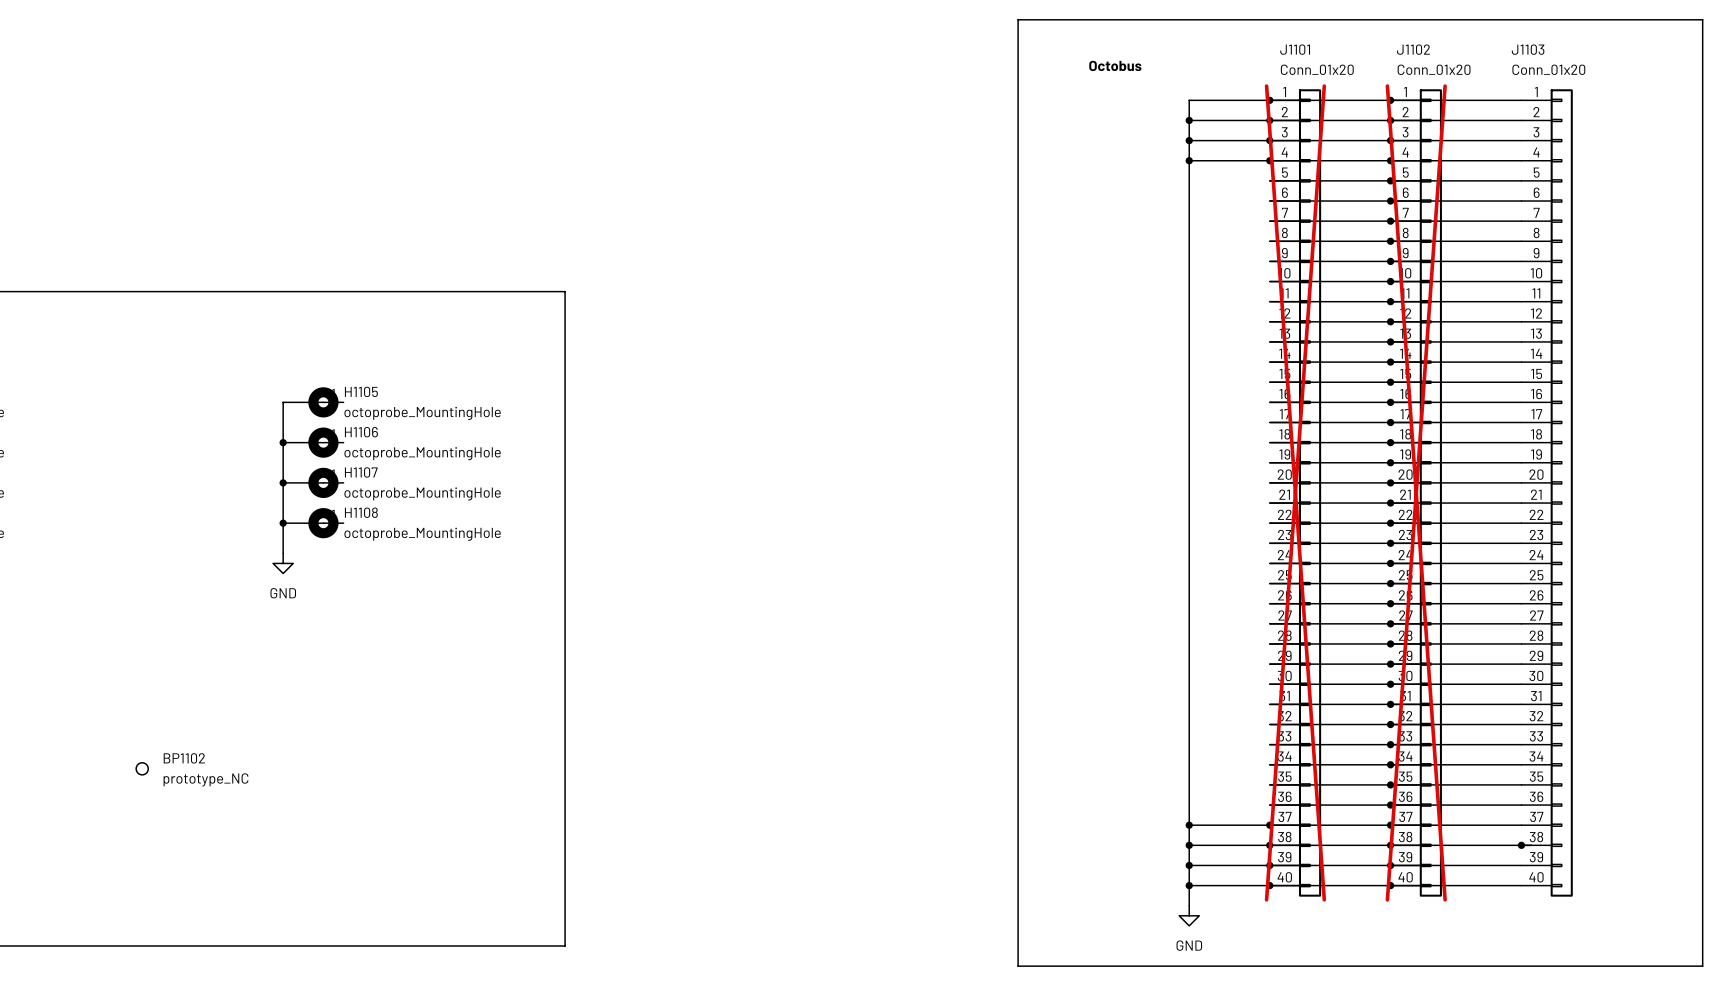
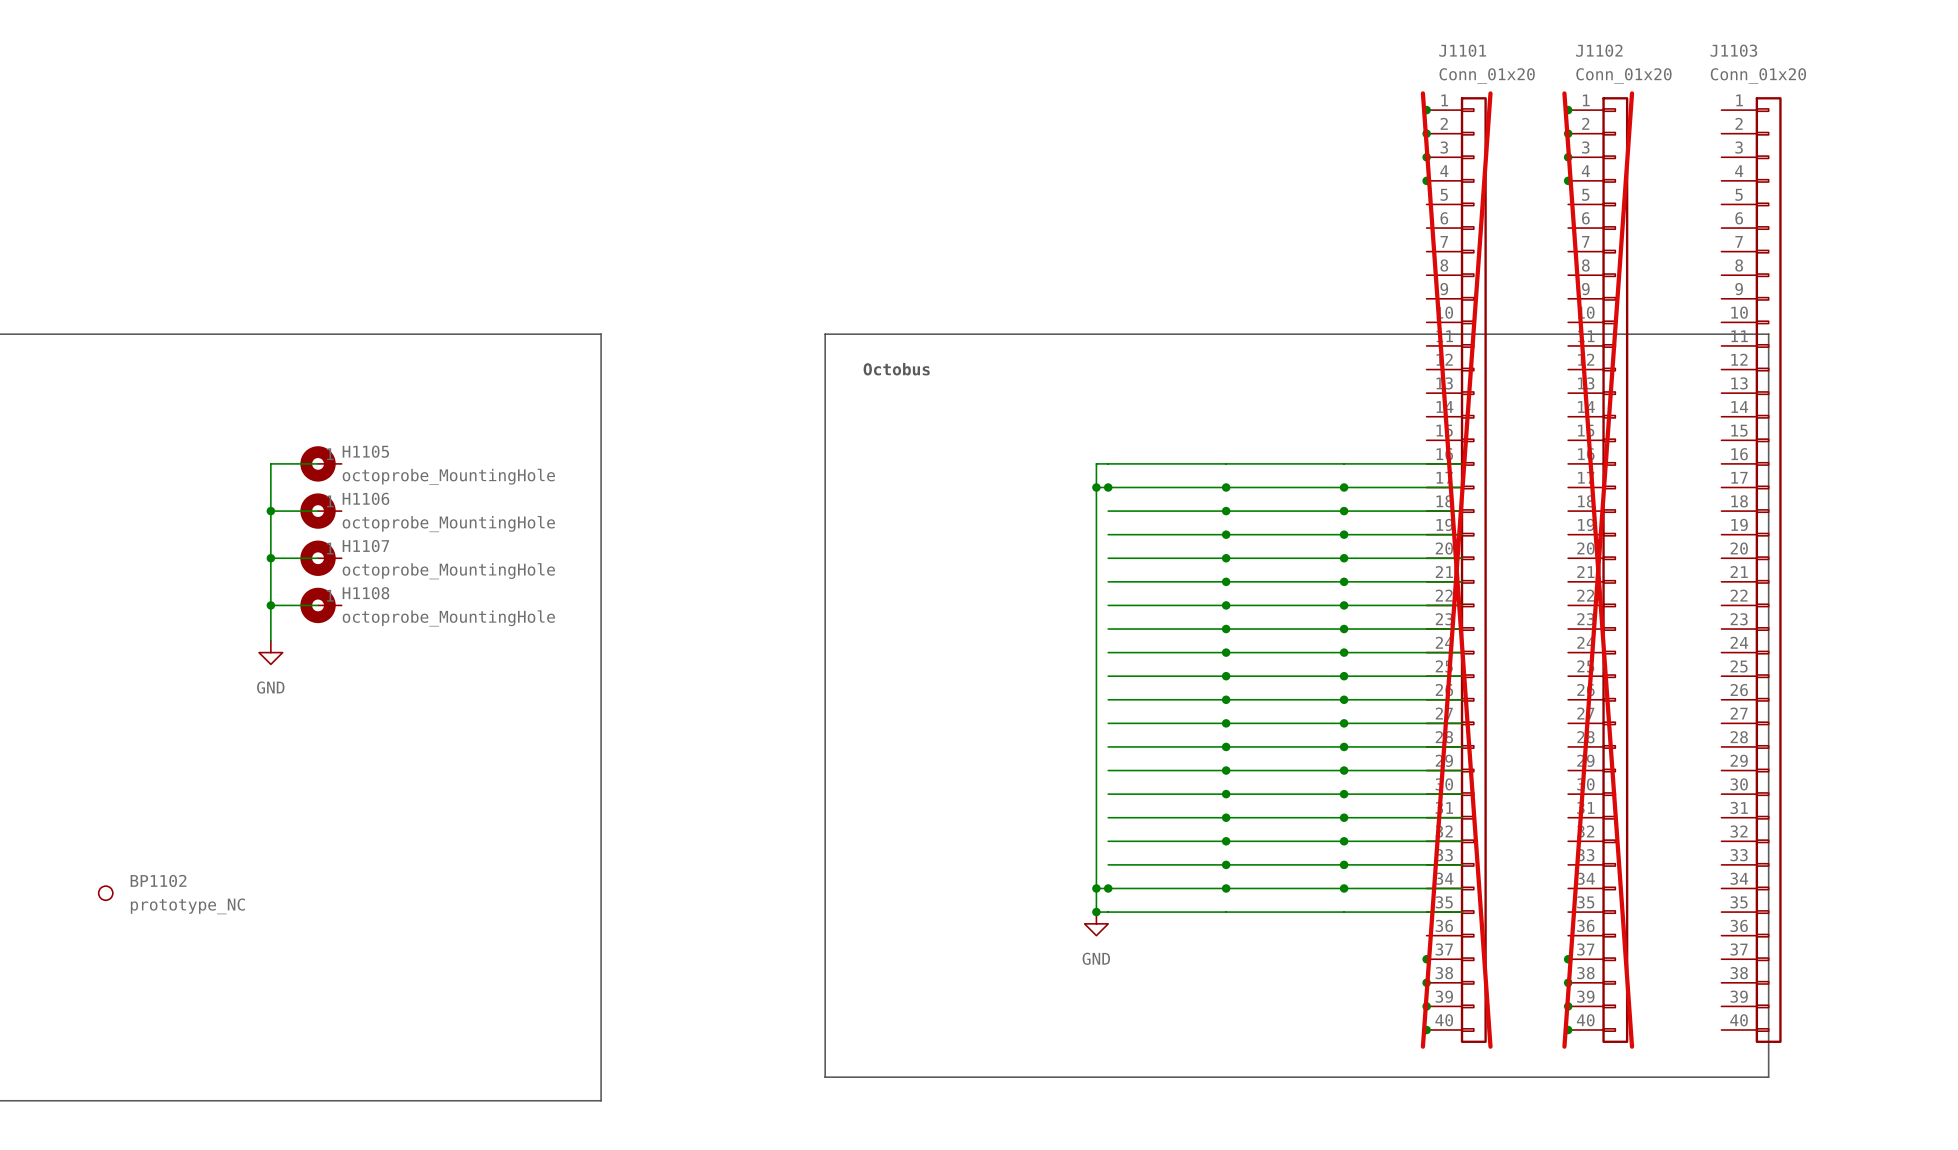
line: (1018, 19) (1702, 19) (1702, 966) (1018, 966) (1018, 19) -> none
text: Octobus (1115, 65) -> none
wire: (1521, 100) (1189, 100) (1189, 905) -> none
wire: (1189, 120) (1521, 120) -> none
junction: (1189, 120) -> none
wire: (1189, 140) (1521, 140) -> none
junction: (1189, 140) -> none
wire: (1189, 160) (1521, 160) -> none
junction: (1189, 160) -> none
wire: (1269, 180) (1521, 180) -> none
junction: (1390, 180) -> none
wire: (1269, 201) (1521, 201) -> none
junction: (1390, 201) -> none
wire: (1269, 221) (1521, 221) -> none
junction: (1390, 221) -> none
wire: (1269, 241) (1521, 241) -> none
junction: (1390, 241) -> none
wire: (1269, 261) (1521, 261) -> none
junction: (1390, 261) -> none
wire: (1269, 281) (1521, 281) -> none
junction: (1390, 281) -> none
line: none -> (825, 334) (1768, 334) (1768, 1077) (825, 1077) (825, 334)
wire: (1269, 301) (1521, 301) -> none
junction: (1390, 301) -> none
text: none -> Octobus (896, 369)
wire: (1269, 321) (1521, 321) -> none
junction: (1390, 321) -> none
wire: (1269, 341) (1521, 341) -> none
junction: (1390, 341) -> none
wire: (1269, 362) (1521, 362) -> none
junction: (1390, 362) -> none
wire: (1269, 382) (1521, 382) -> none
junction: (1390, 382) -> none
wire: none -> (1426, 463) (1096, 463) (1096, 912) (1426, 912)
wire: (1299, 402) (1521, 402) -> none
junction: (1390, 402) -> none
wire: none -> (1096, 487) (1426, 487)
junction: none -> (1096, 487)
junction: none -> (1108, 487)
junction: none -> (1226, 487)
junction: none -> (1344, 487)
wire: (1299, 422) (1521, 422) -> none
junction: (1390, 422) -> none
wire: none -> (1108, 511) (1426, 511)
junction: none -> (1226, 511)
junction: none -> (1344, 511)
wire: (1299, 442) (1521, 442) -> none
junction: (1390, 442) -> none
wire: none -> (1108, 534) (1426, 534)
junction: none -> (1226, 534)
junction: none -> (1344, 534)
wire: (1299, 462) (1521, 462) -> none
junction: (1390, 462) -> none
wire: none -> (1108, 558) (1426, 558)
junction: none -> (1226, 558)
junction: none -> (1344, 558)
wire: (1299, 482) (1521, 482) -> none
junction: (1390, 482) -> none
wire: none -> (1108, 581) (1426, 581)
junction: none -> (1226, 581)
junction: none -> (1344, 581)
wire: (1299, 503) (1521, 503) -> none
junction: (1390, 503) -> none
wire: none -> (1108, 605) (1426, 605)
junction: none -> (1226, 605)
junction: none -> (1344, 605)
wire: (1299, 523) (1521, 523) -> none
junction: (1390, 523) -> none
wire: none -> (1108, 629) (1426, 629)
junction: none -> (1226, 629)
junction: none -> (1344, 629)
wire: (1299, 543) (1521, 543) -> none
junction: (1390, 543) -> none
wire: none -> (1108, 652) (1426, 652)
junction: none -> (1226, 652)
junction: none -> (1344, 652)
wire: (1299, 563) (1521, 563) -> none
junction: (1390, 563) -> none
wire: none -> (1108, 676) (1426, 676)
junction: none -> (1226, 676)
junction: none -> (1344, 676)
wire: (1299, 583) (1521, 583) -> none
junction: (1390, 583) -> none
wire: none -> (1108, 699) (1426, 699)
junction: none -> (1226, 699)
junction: none -> (1344, 699)
wire: (1299, 603) (1521, 603) -> none
junction: (1390, 603) -> none
wire: none -> (1108, 723) (1426, 723)
junction: none -> (1226, 723)
junction: none -> (1344, 723)
wire: (1299, 623) (1521, 623) -> none
junction: (1390, 623) -> none
wire: none -> (1108, 746) (1426, 746)
junction: none -> (1226, 746)
junction: none -> (1344, 746)
wire: (1299, 643) (1521, 643) -> none
junction: (1390, 643) -> none
wire: none -> (1108, 770) (1426, 770)
junction: none -> (1226, 770)
junction: none -> (1344, 770)
wire: (1299, 664) (1521, 664) -> none
junction: (1390, 664) -> none
wire: none -> (1108, 794) (1426, 794)
junction: none -> (1226, 794)
junction: none -> (1344, 794)
wire: (1299, 684) (1521, 684) -> none
junction: (1390, 684) -> none
wire: none -> (1108, 817) (1426, 817)
junction: none -> (1226, 817)
junction: none -> (1344, 817)
wire: (1299, 704) (1521, 704) -> none
junction: (1390, 704) -> none
wire: none -> (1108, 841) (1426, 841)
junction: none -> (1226, 841)
junction: none -> (1344, 841)
wire: (1299, 724) (1521, 724) -> none
junction: (1390, 724) -> none
wire: none -> (1108, 864) (1426, 864)
junction: none -> (1226, 864)
junction: none -> (1344, 864)
wire: (1299, 744) (1521, 744) -> none
junction: (1390, 744) -> none
wire: none -> (1096, 888) (1426, 888)
junction: none -> (1096, 888)
junction: none -> (1108, 888)
junction: none -> (1226, 888)
junction: none -> (1344, 888)
wire: (1299, 764) (1521, 764) -> none
junction: (1390, 764) -> none
junction: none -> (1096, 912)
wire: (1299, 784) (1521, 784) -> none
junction: (1390, 784) -> none
power symbol: none -> GND (1096, 923)
wire: (1269, 805) (1521, 805) -> none
junction: (1390, 805) -> none
wire: (1189, 825) (1521, 825) -> none
junction: (1189, 825) -> none
wire: (1189, 845) (1531, 845) -> none
junction: (1189, 845) -> none
junction: (1521, 845) -> none
wire: (1189, 865) (1521, 865) -> none
junction: (1189, 865) -> none
wire: (1189, 885) (1521, 885) -> none
junction: (1189, 885) -> none
power symbol: GND (1189, 915) -> none

